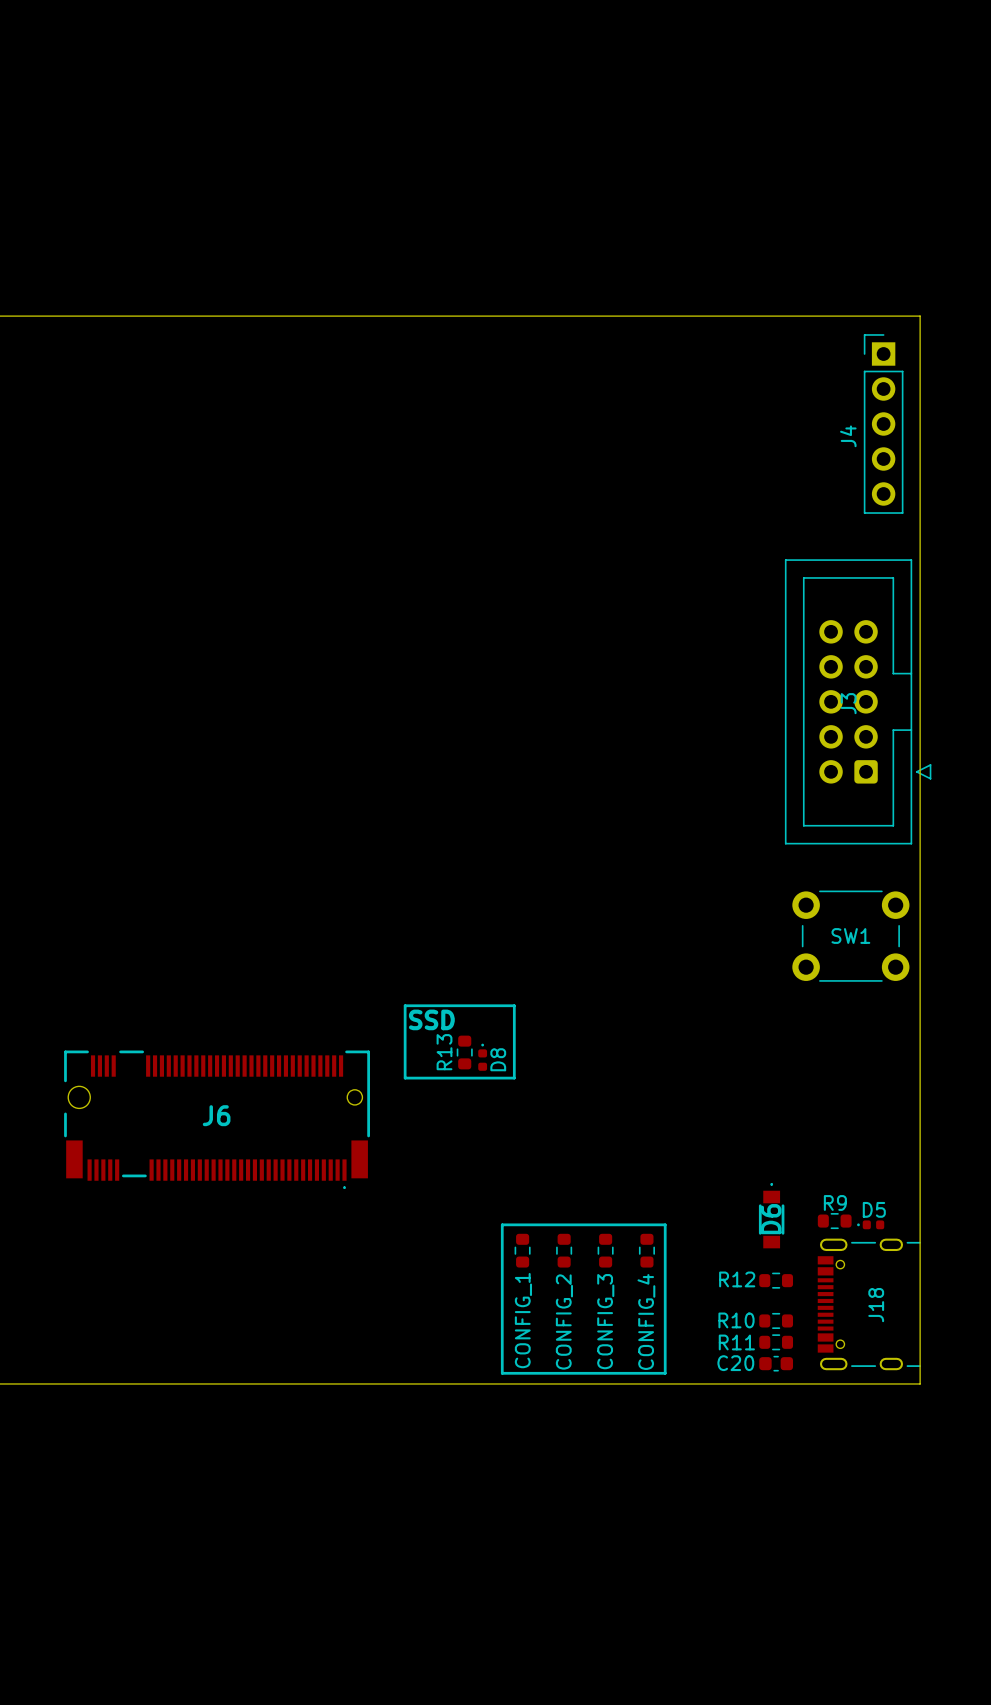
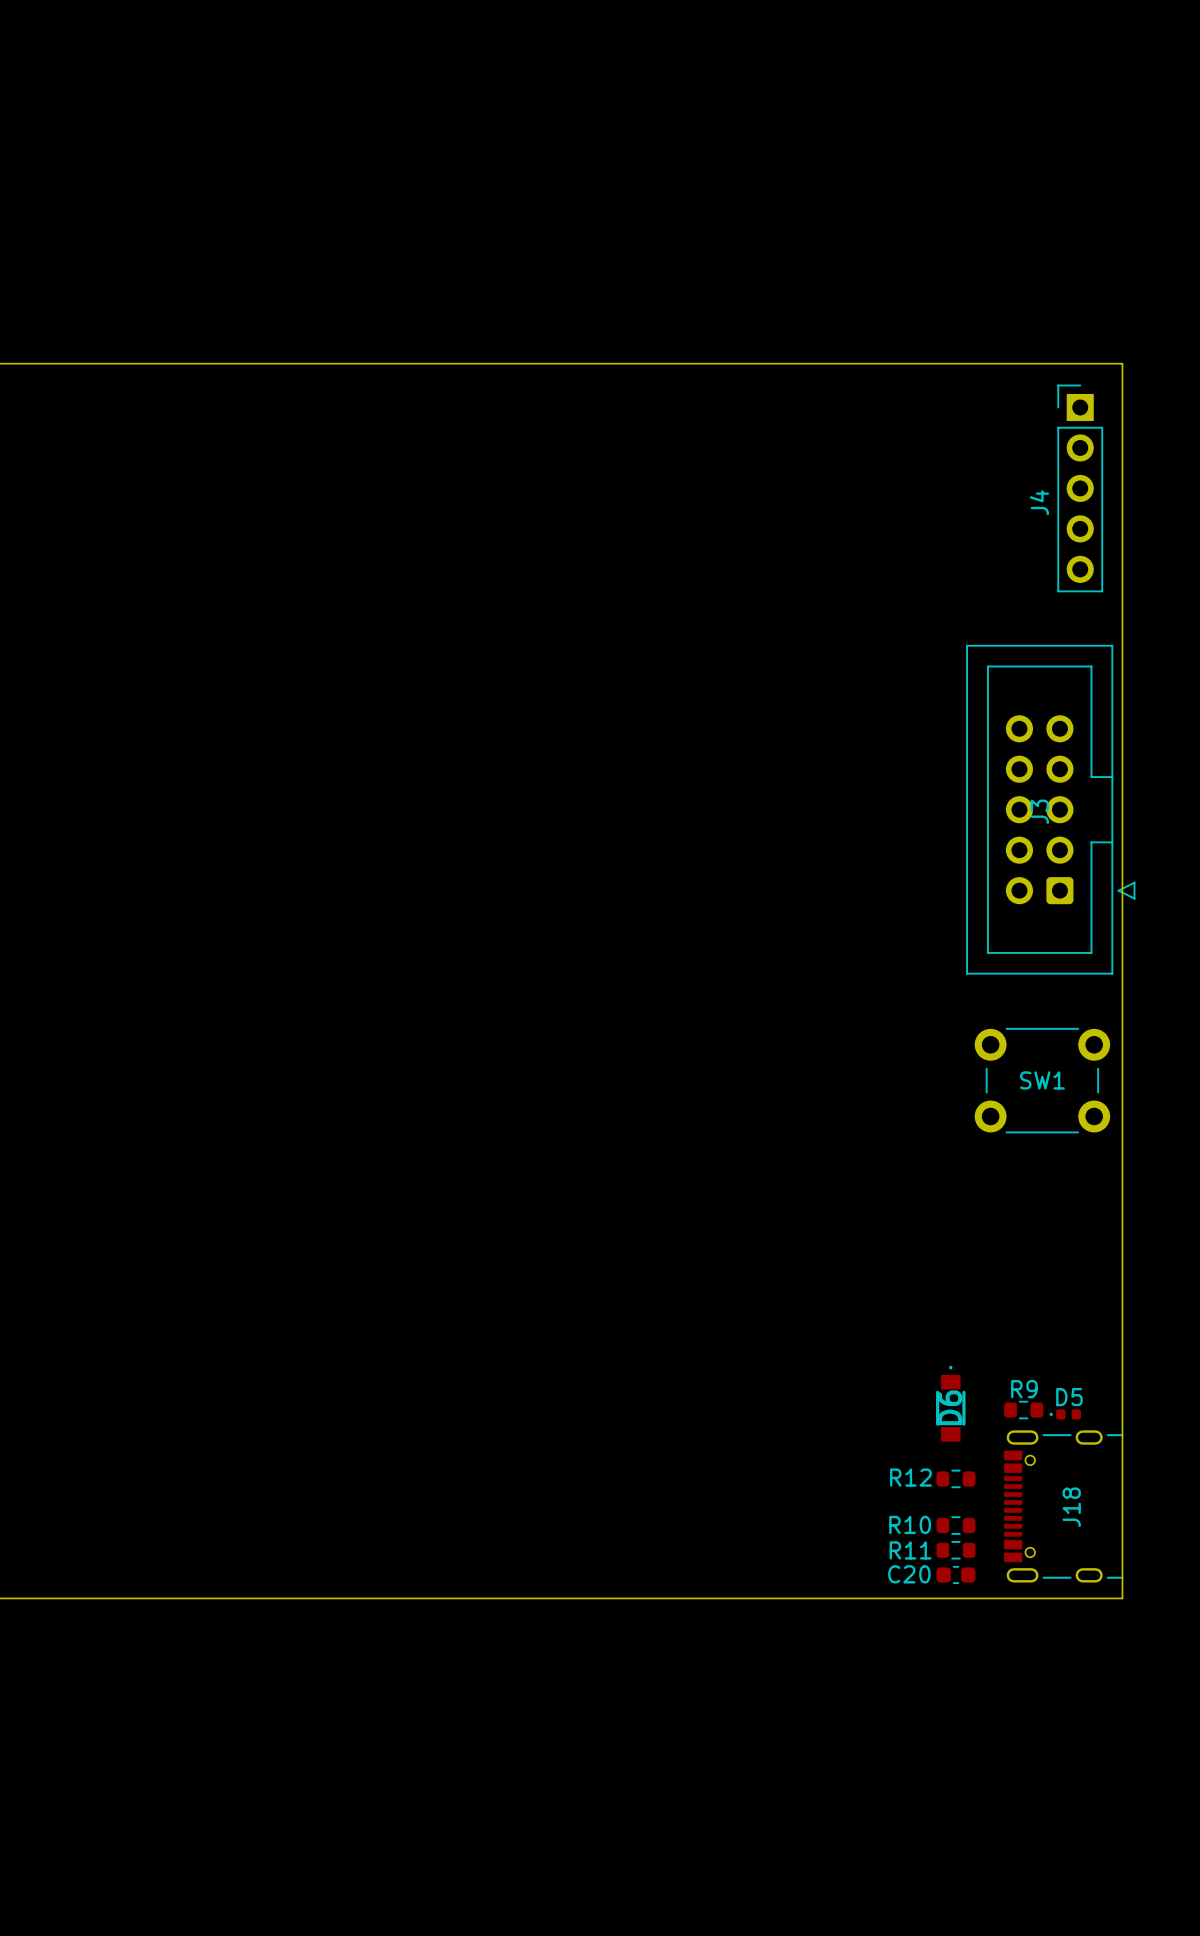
line: (405, 1005) (514, 1005) (514, 1078) (405, 1078) (405, 1005) -> none
text: SSD (431, 1019) -> none
R13: (464, 1052) -> none
D8: (482, 1057) -> none
J6: (217, 1119) -> none
line: (502, 1224) (665, 1224) (665, 1373) (502, 1373) (502, 1224) -> none
CONFIG_1: (522, 1250) -> none
CONFIG_2: (564, 1250) -> none
CONFIG_3: (605, 1250) -> none
CONFIG_4: (646, 1250) -> none

